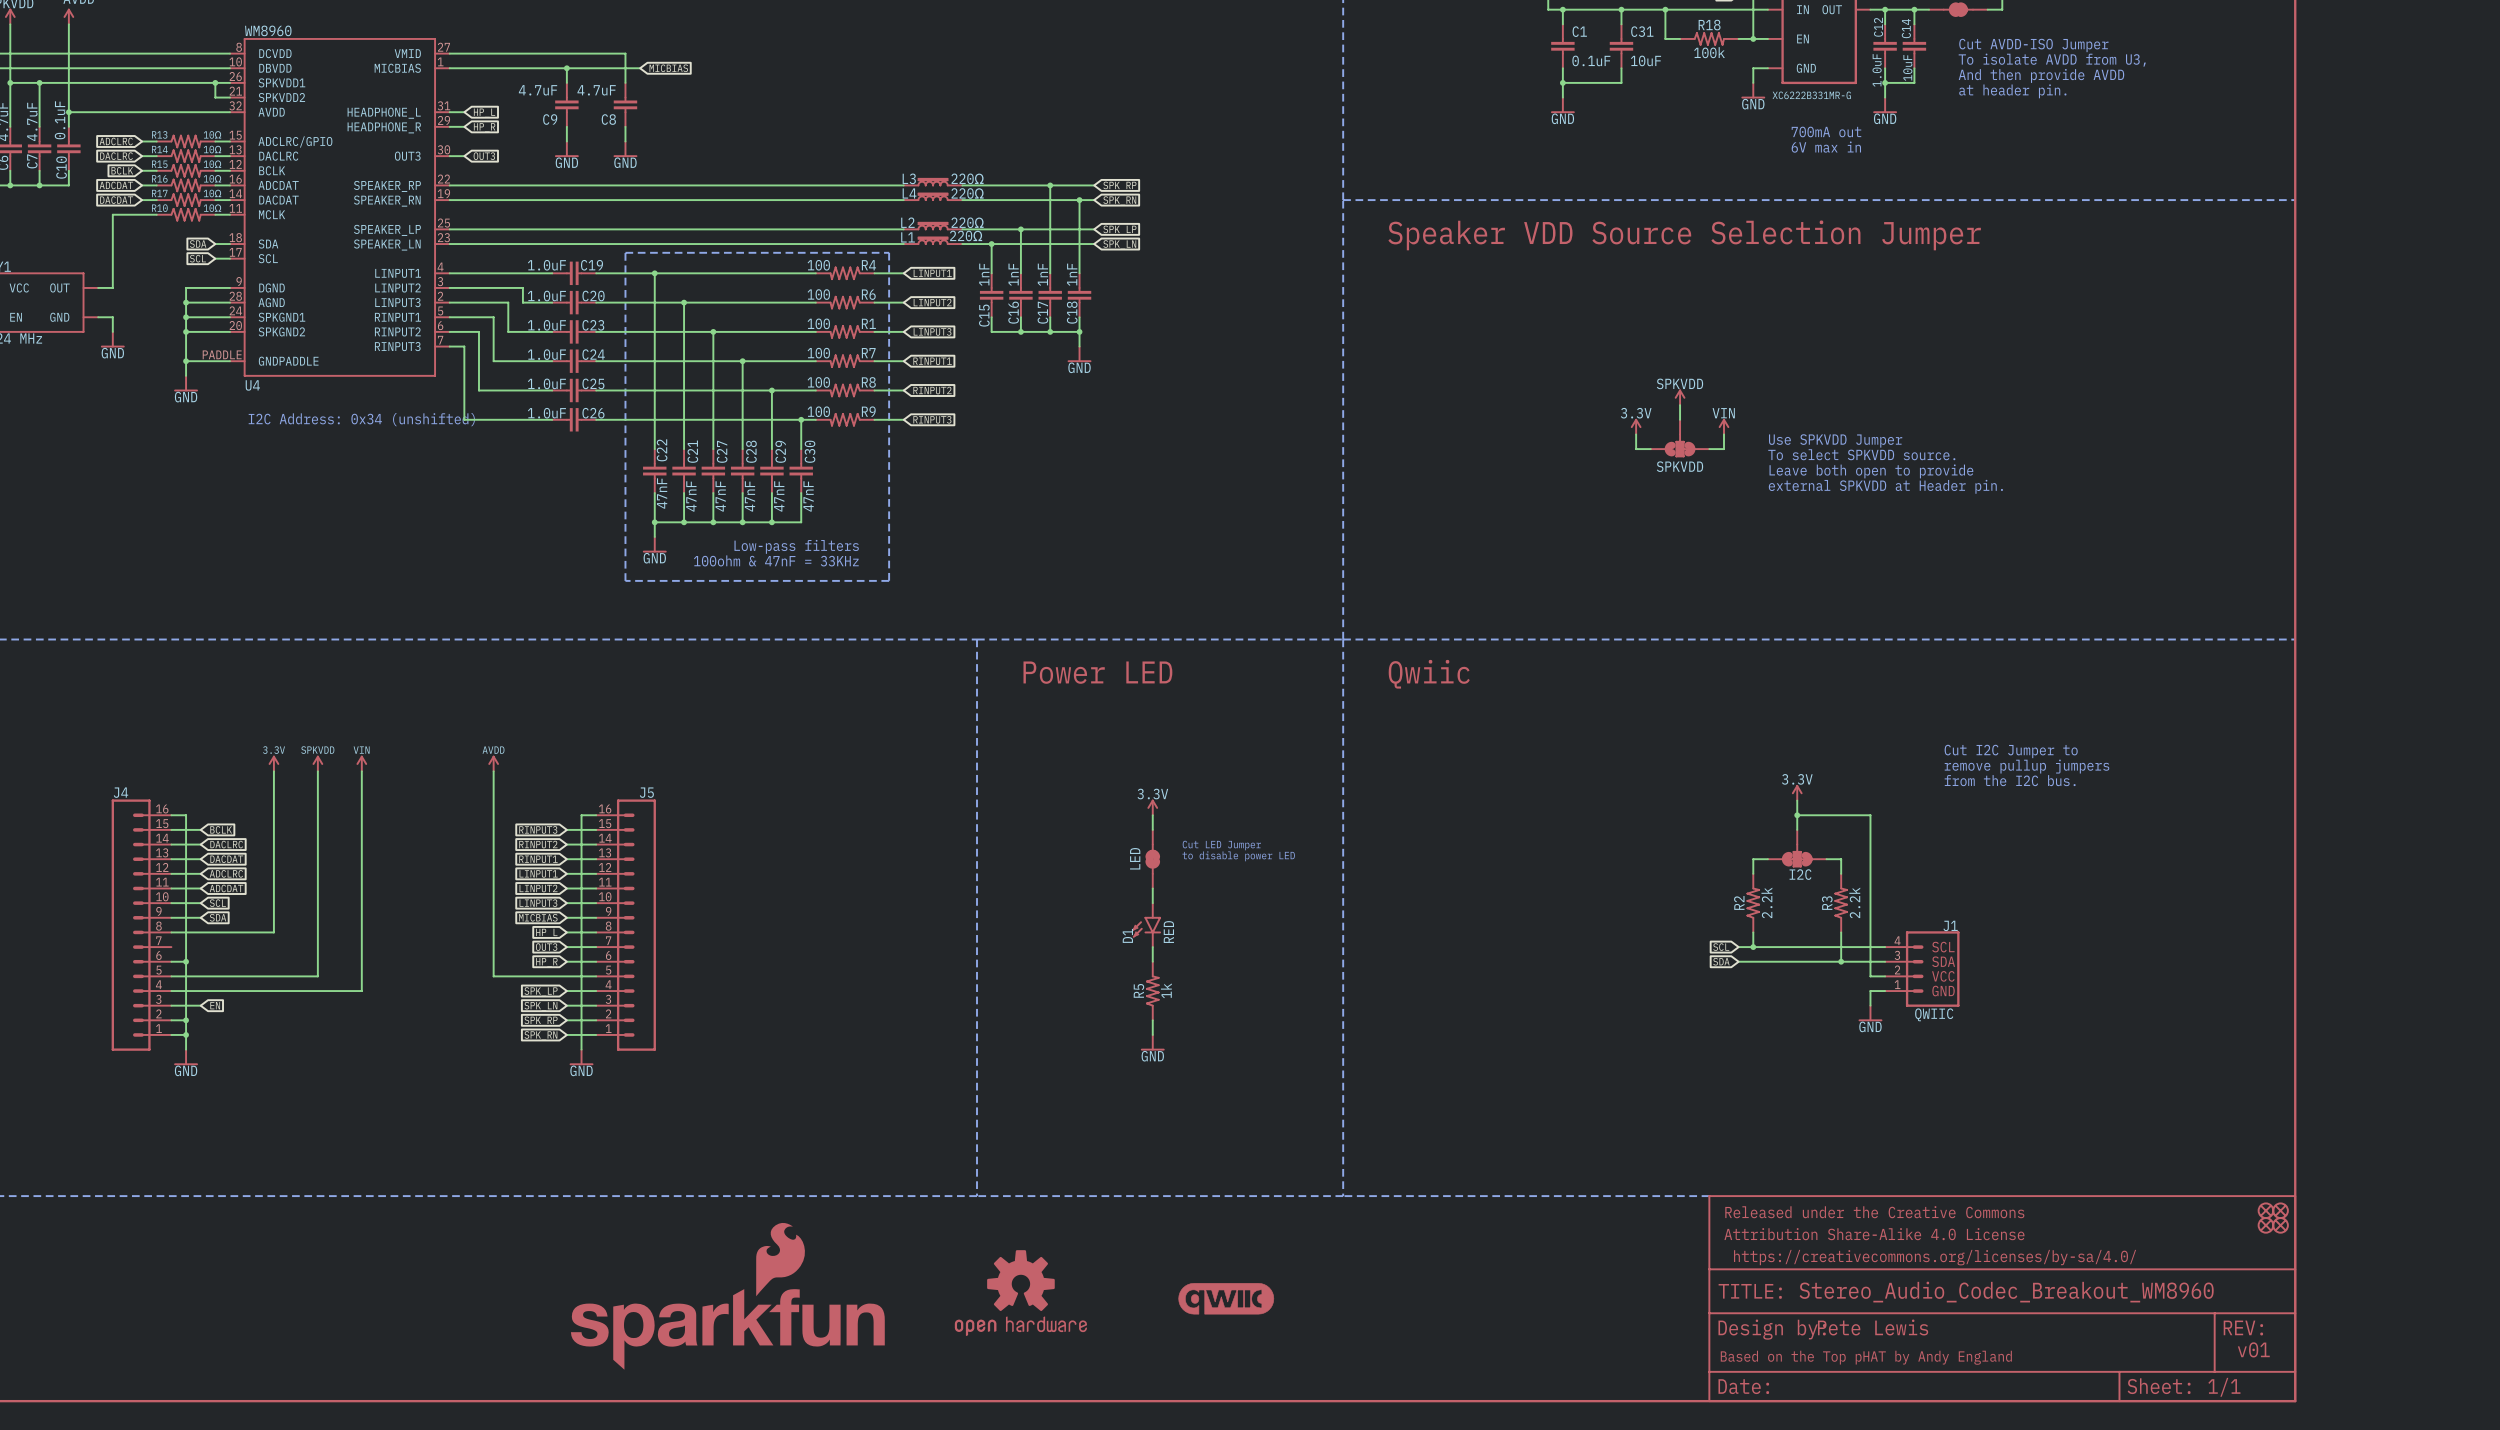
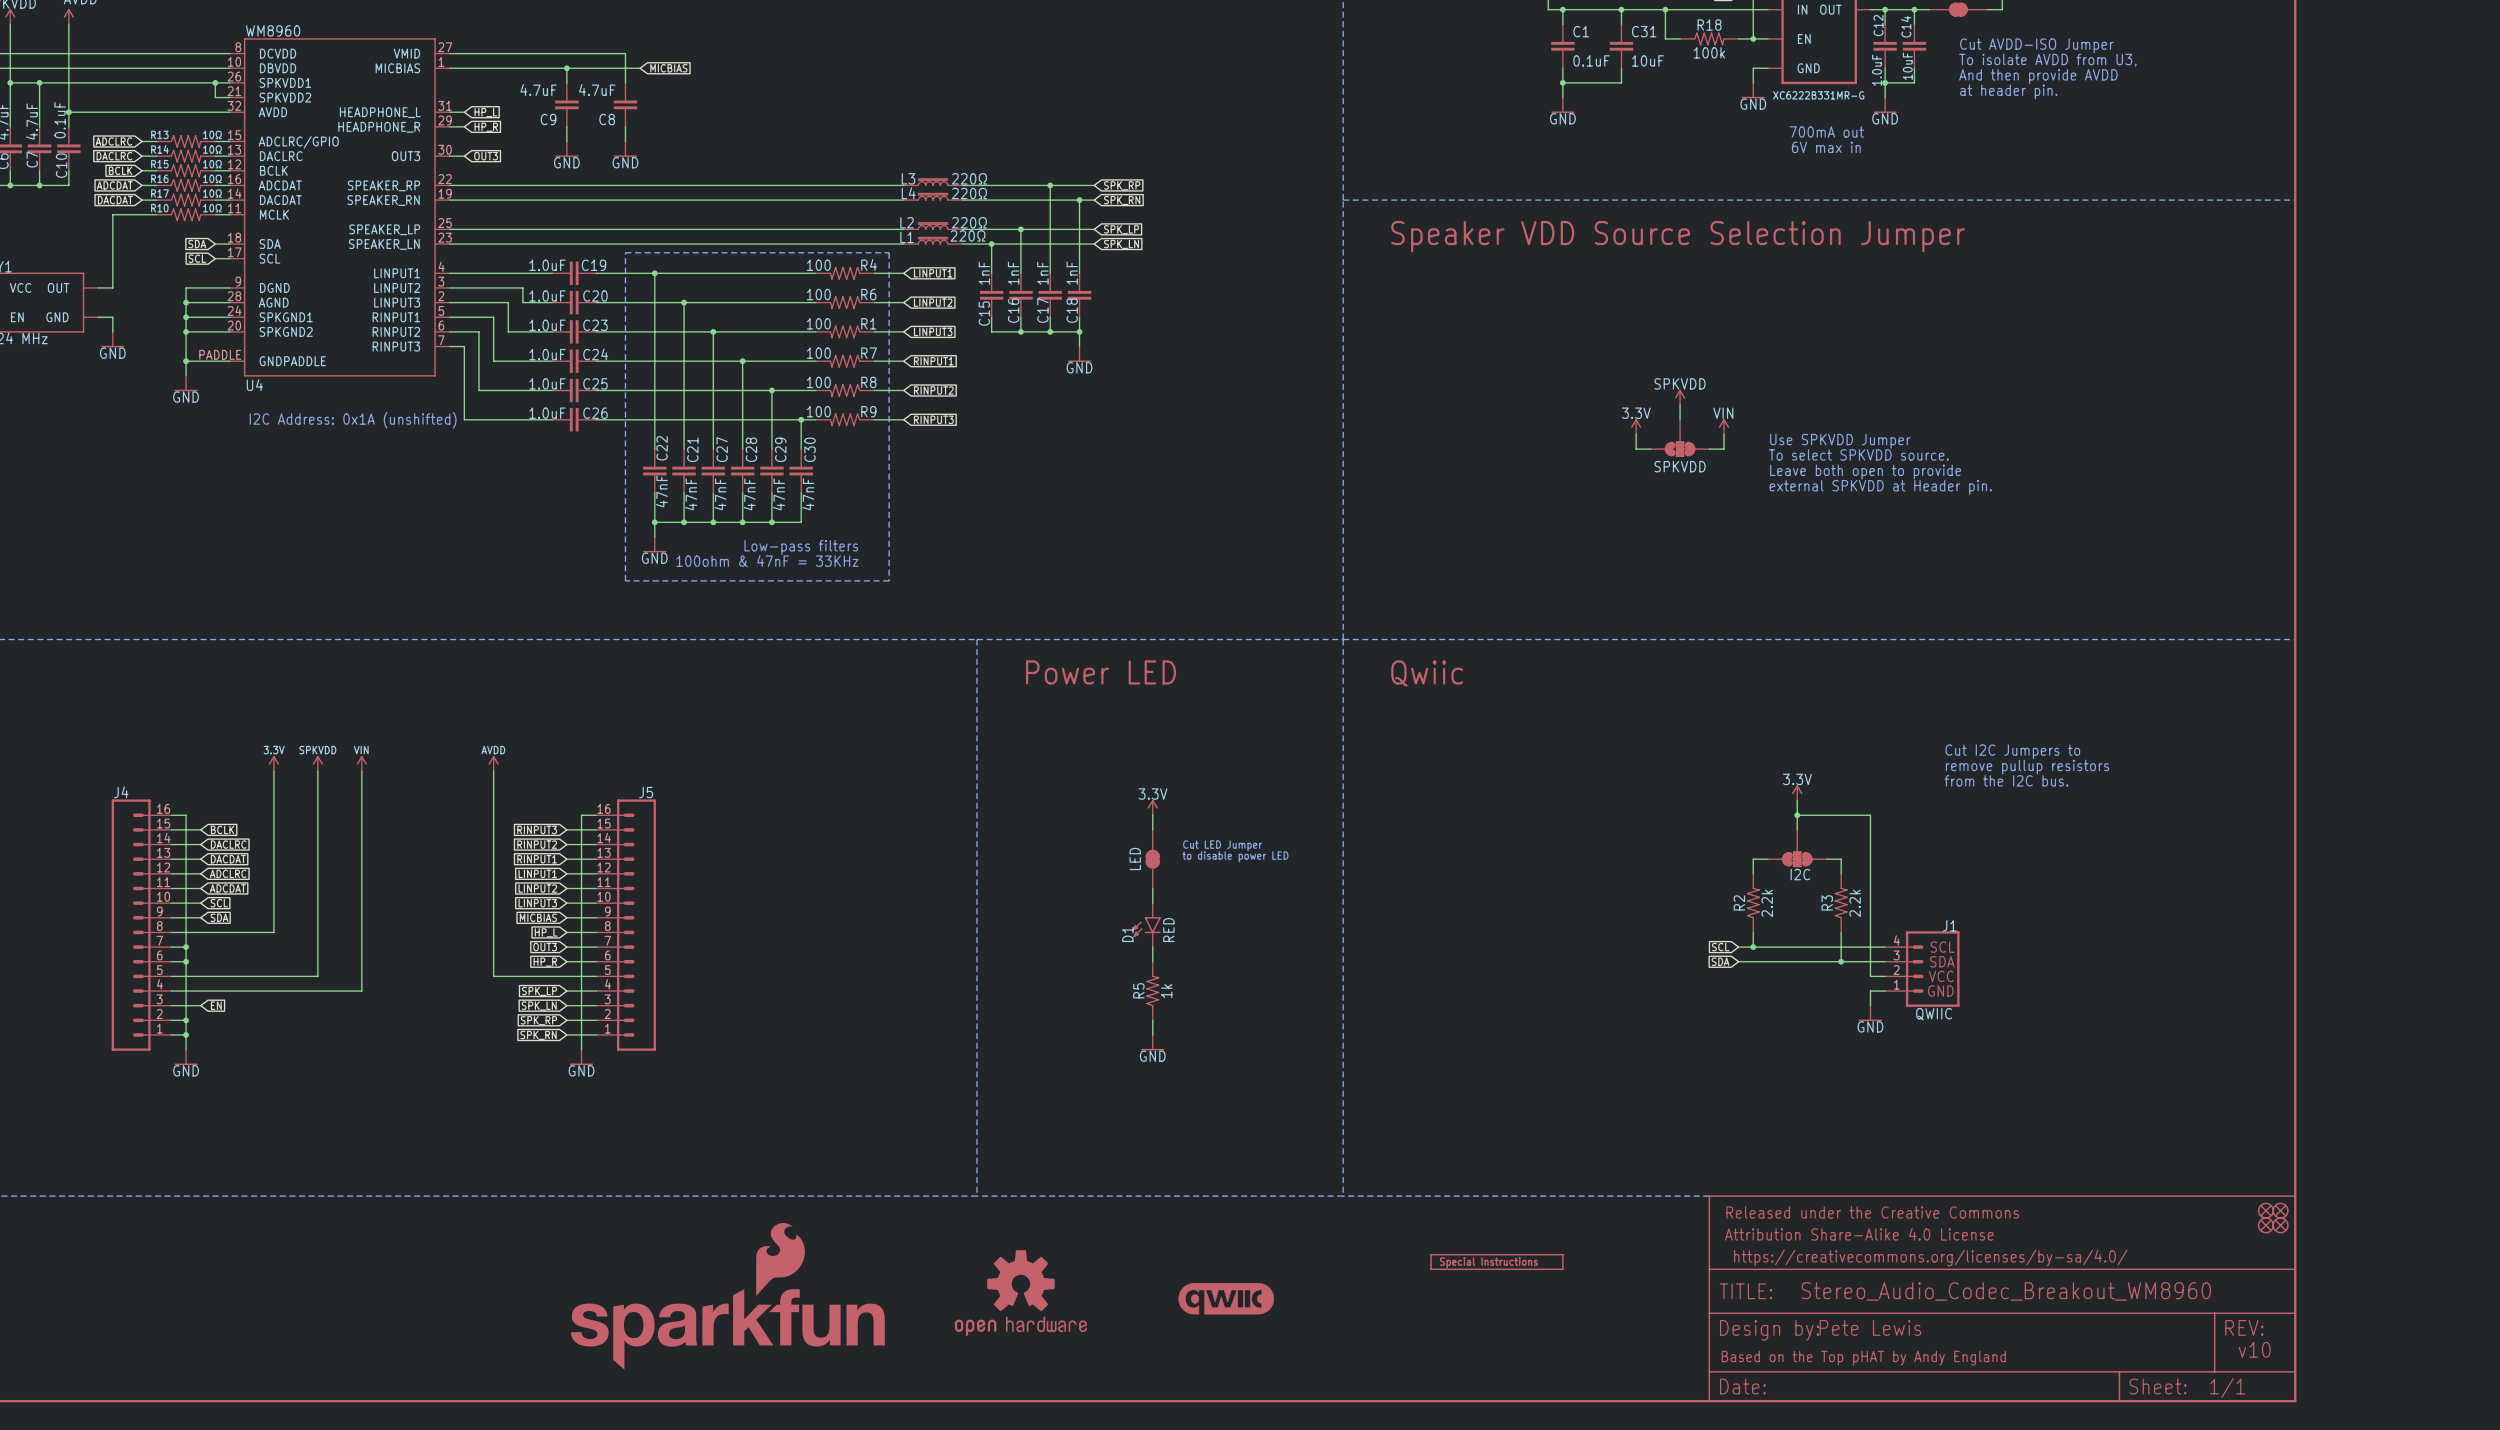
text: I2C Address: 0x34 (unshifted) (361, 419) -> I2C Address: 0x1A (unshifted) (353, 420)
text: Cut I2C Jumper to (2011, 751) -> Cut I2C Jumpers to (2012, 751)
text: remove pullup jumpers (2027, 766) -> remove pullup resistors (2027, 767)
wire: none -> (171, 947) (186, 947)
junction: none -> (186, 947)
part: none -> (1496, 1262)
text: v01 (2253, 1349) -> v10 (2254, 1349)

